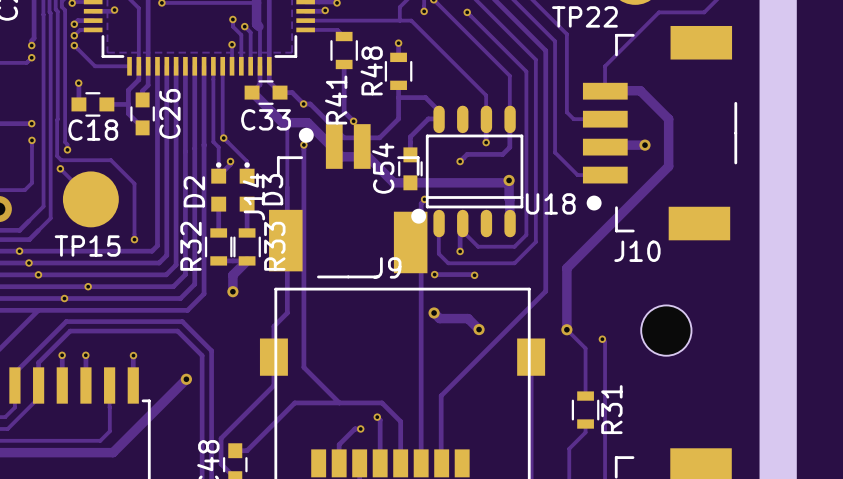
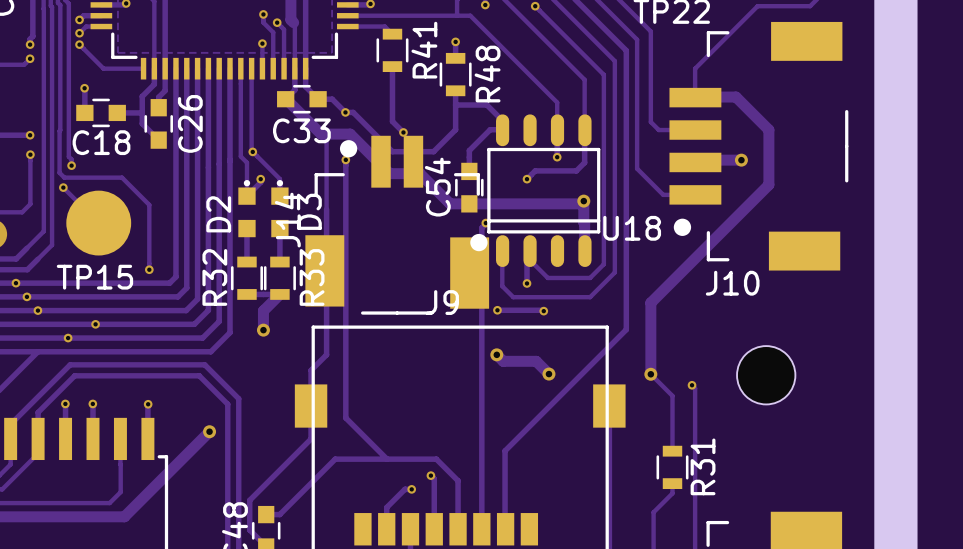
R48 name position: R48 (371, 70) -> R48 (487, 74)
R41 name position: R41 (336, 100) -> R41 (424, 50)

